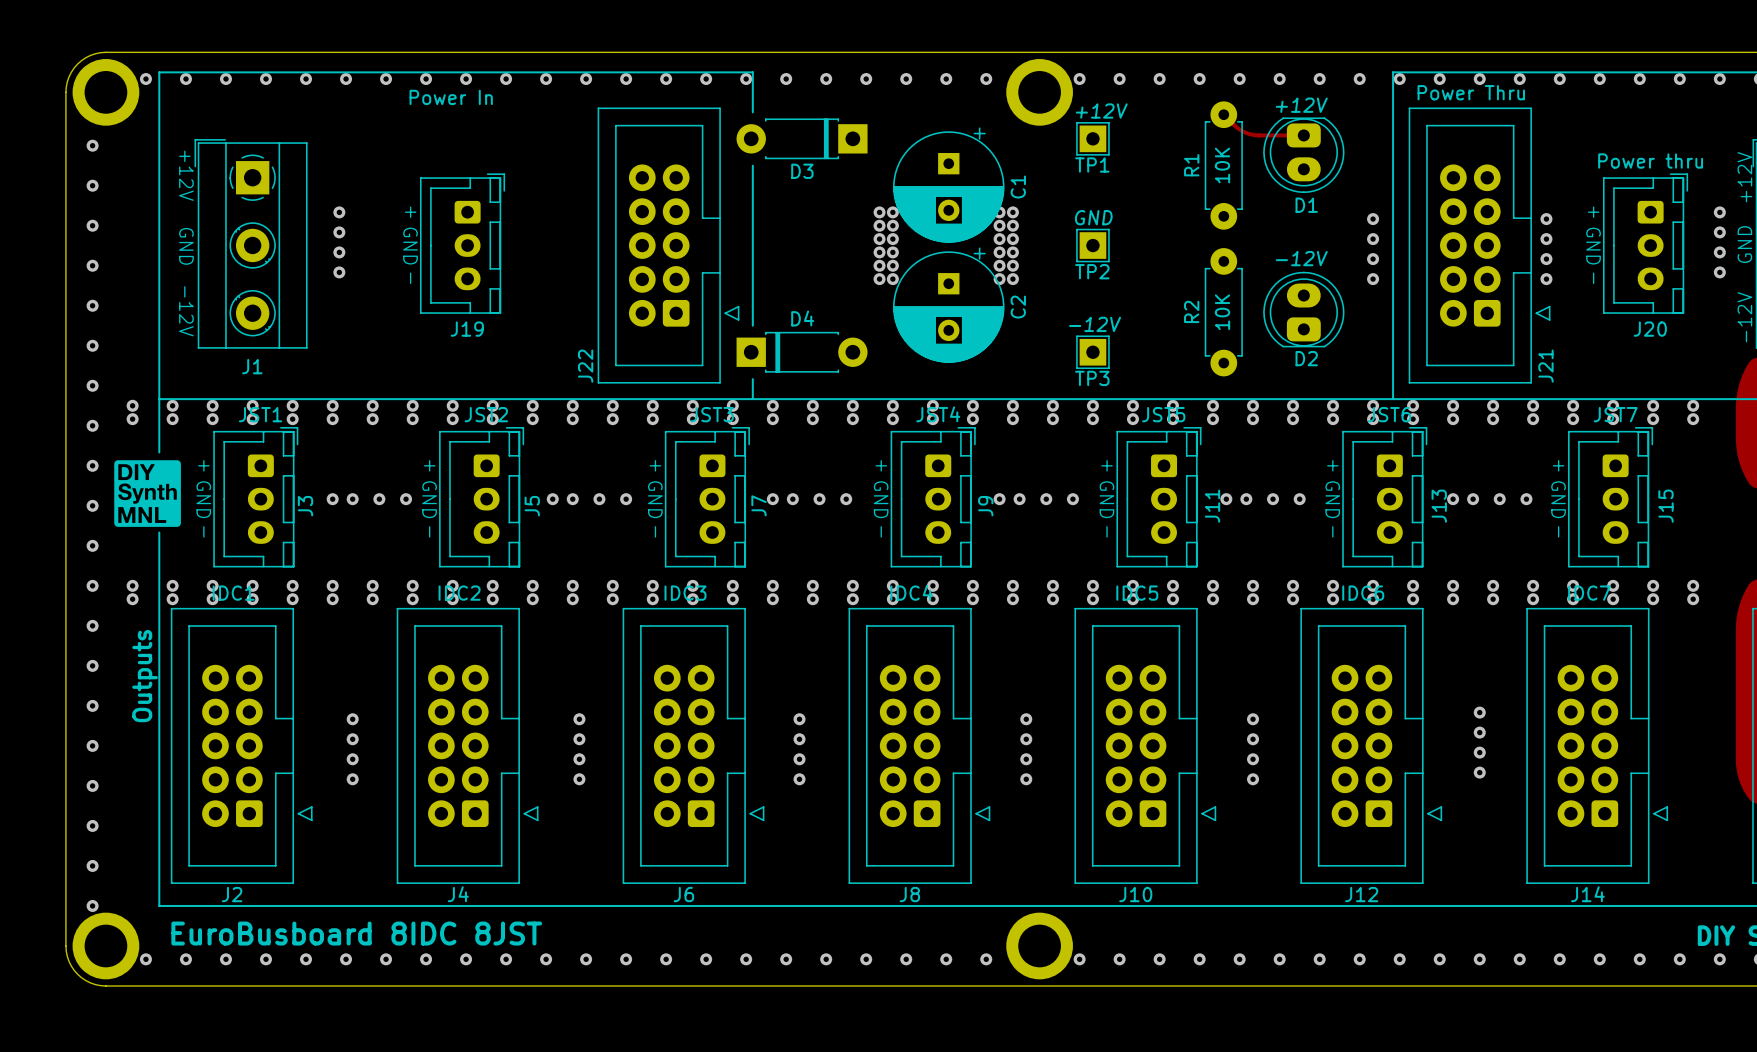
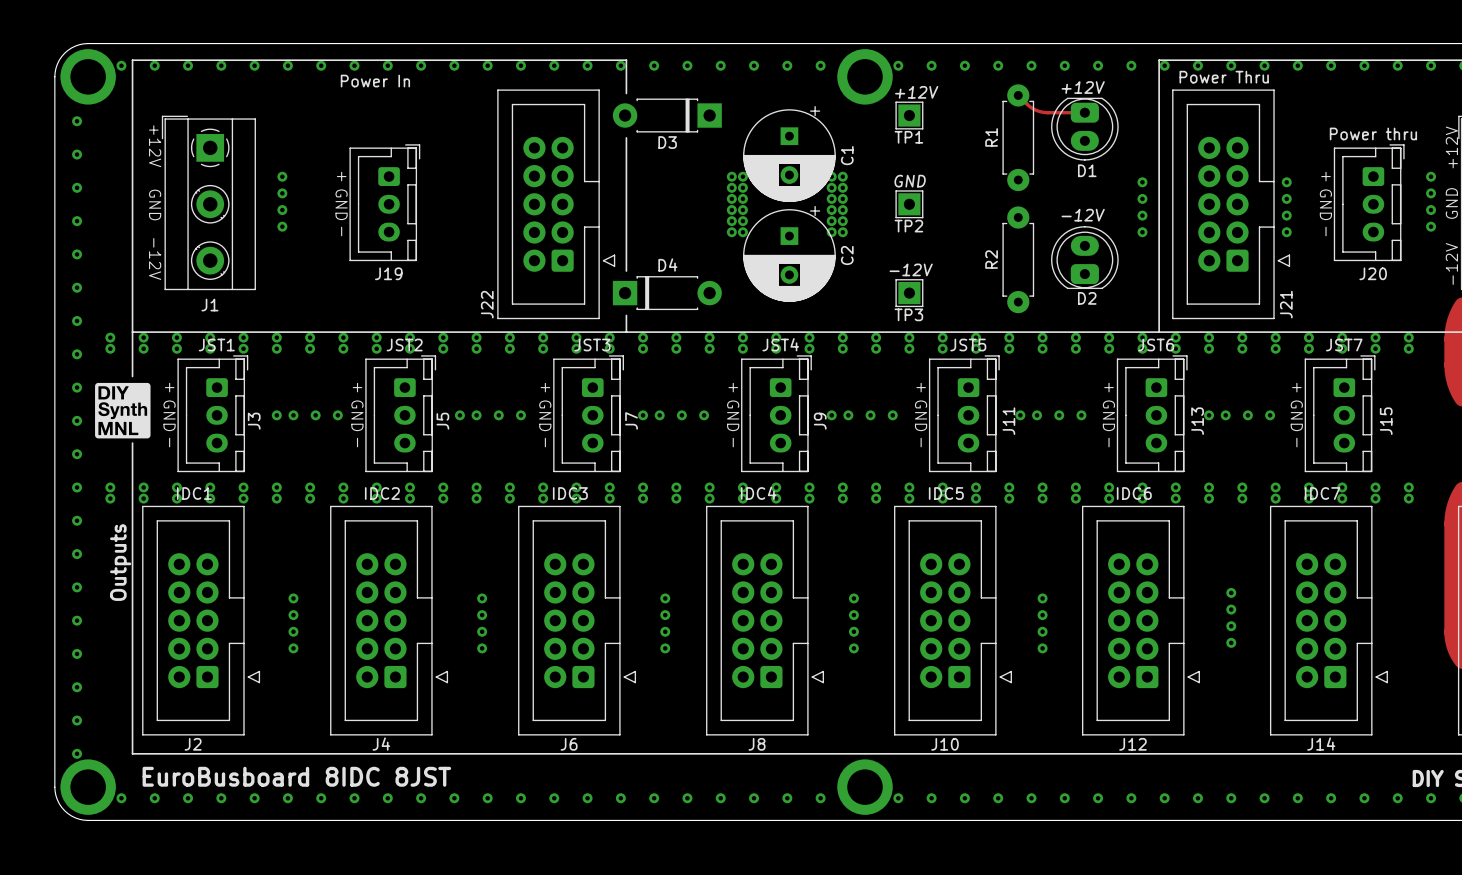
R1 value: 10K (1222, 165) -> none
R2 value: 10K (1222, 312) -> none

